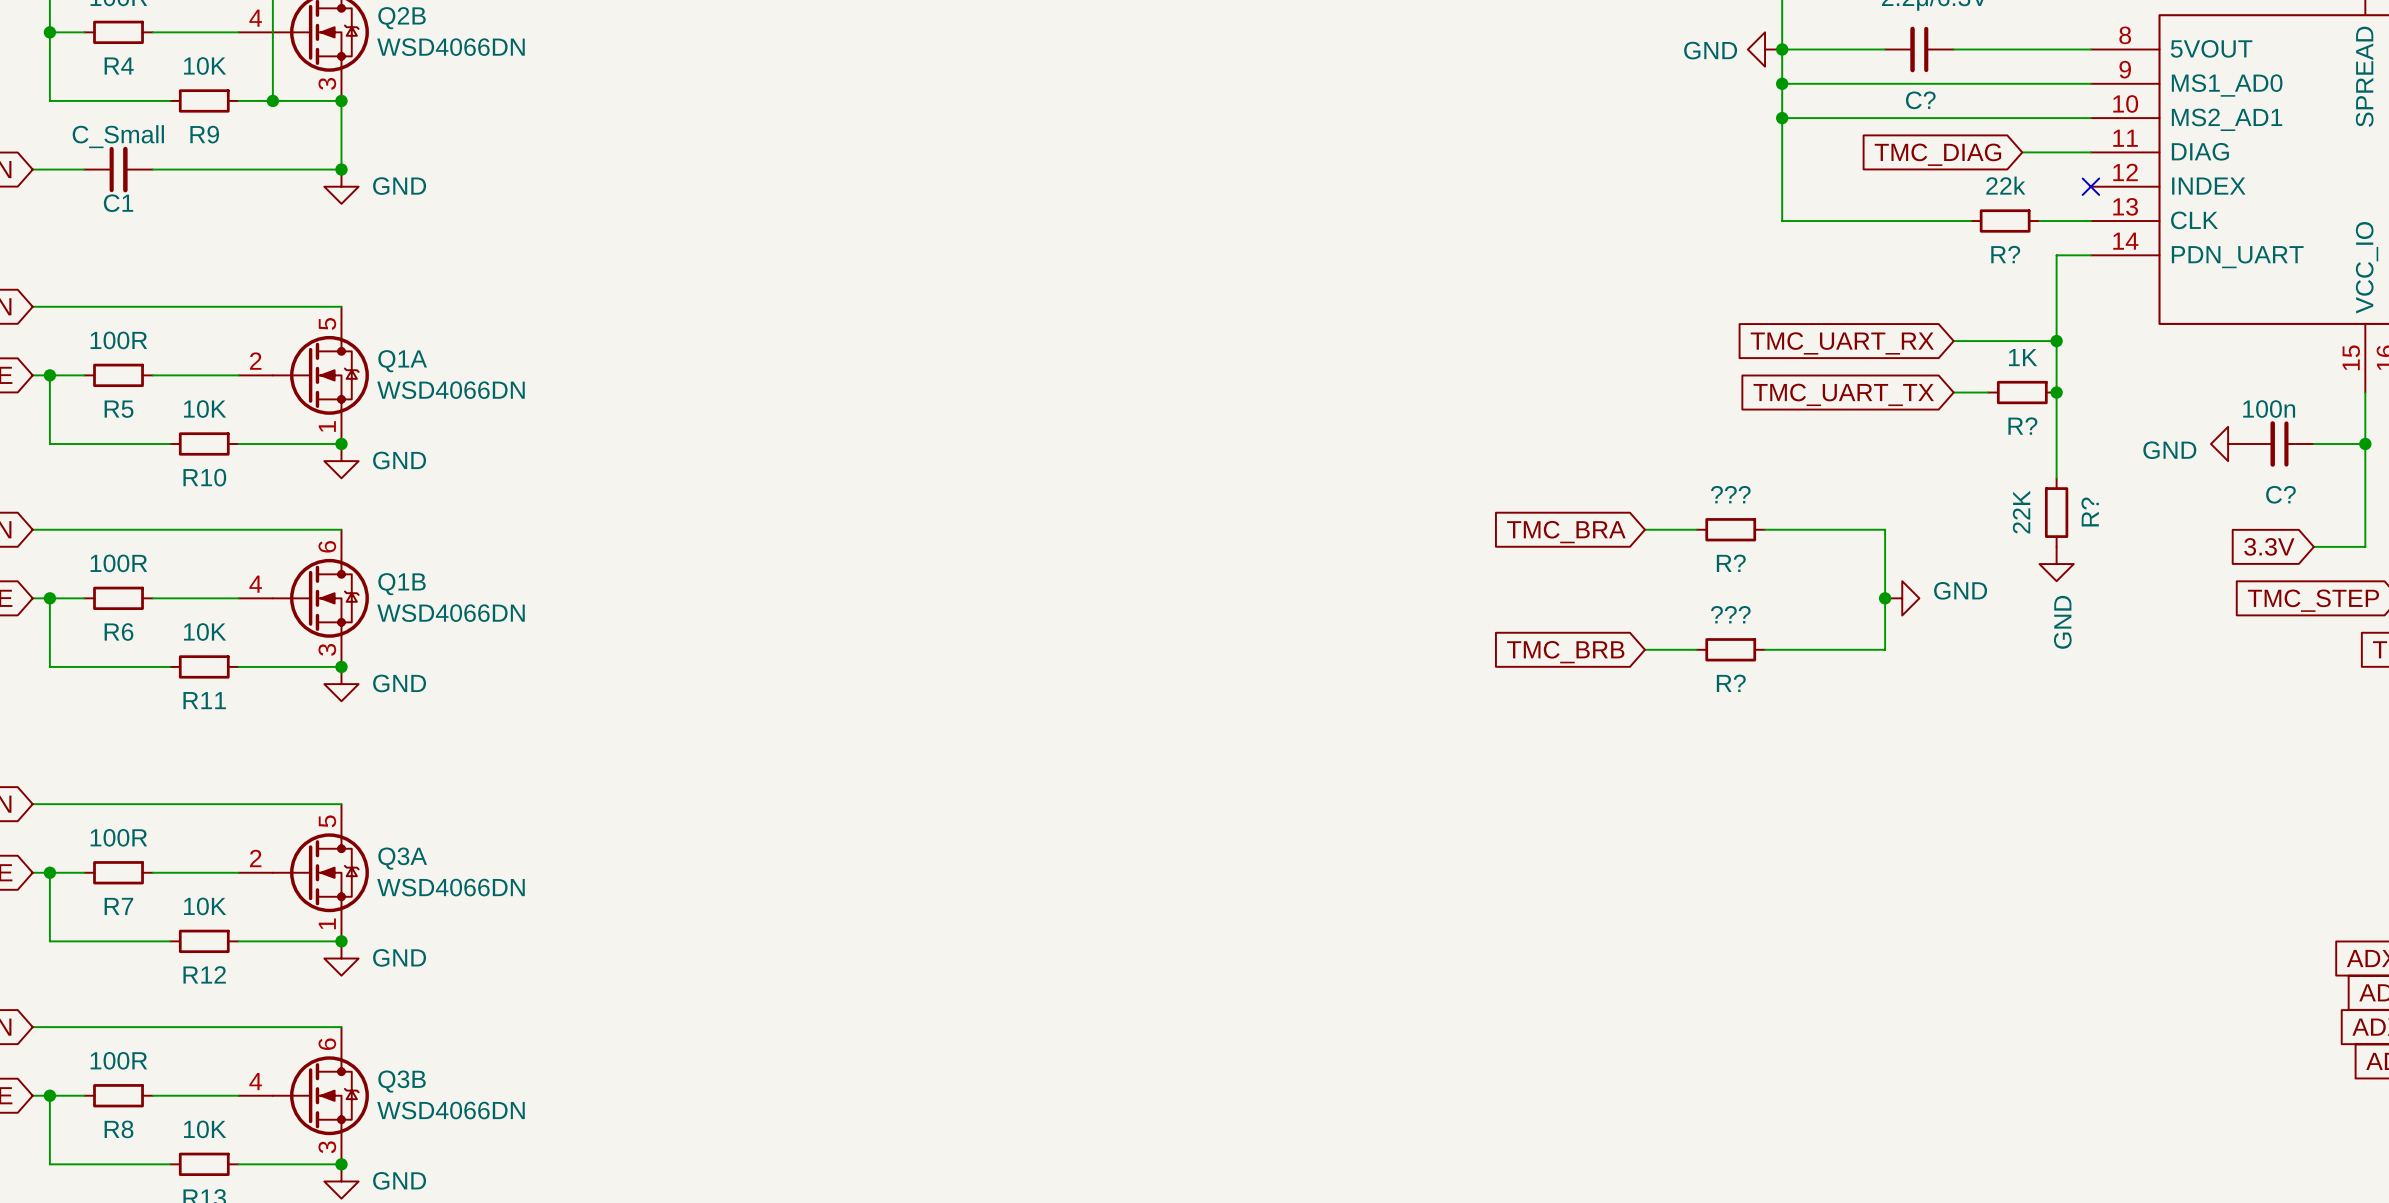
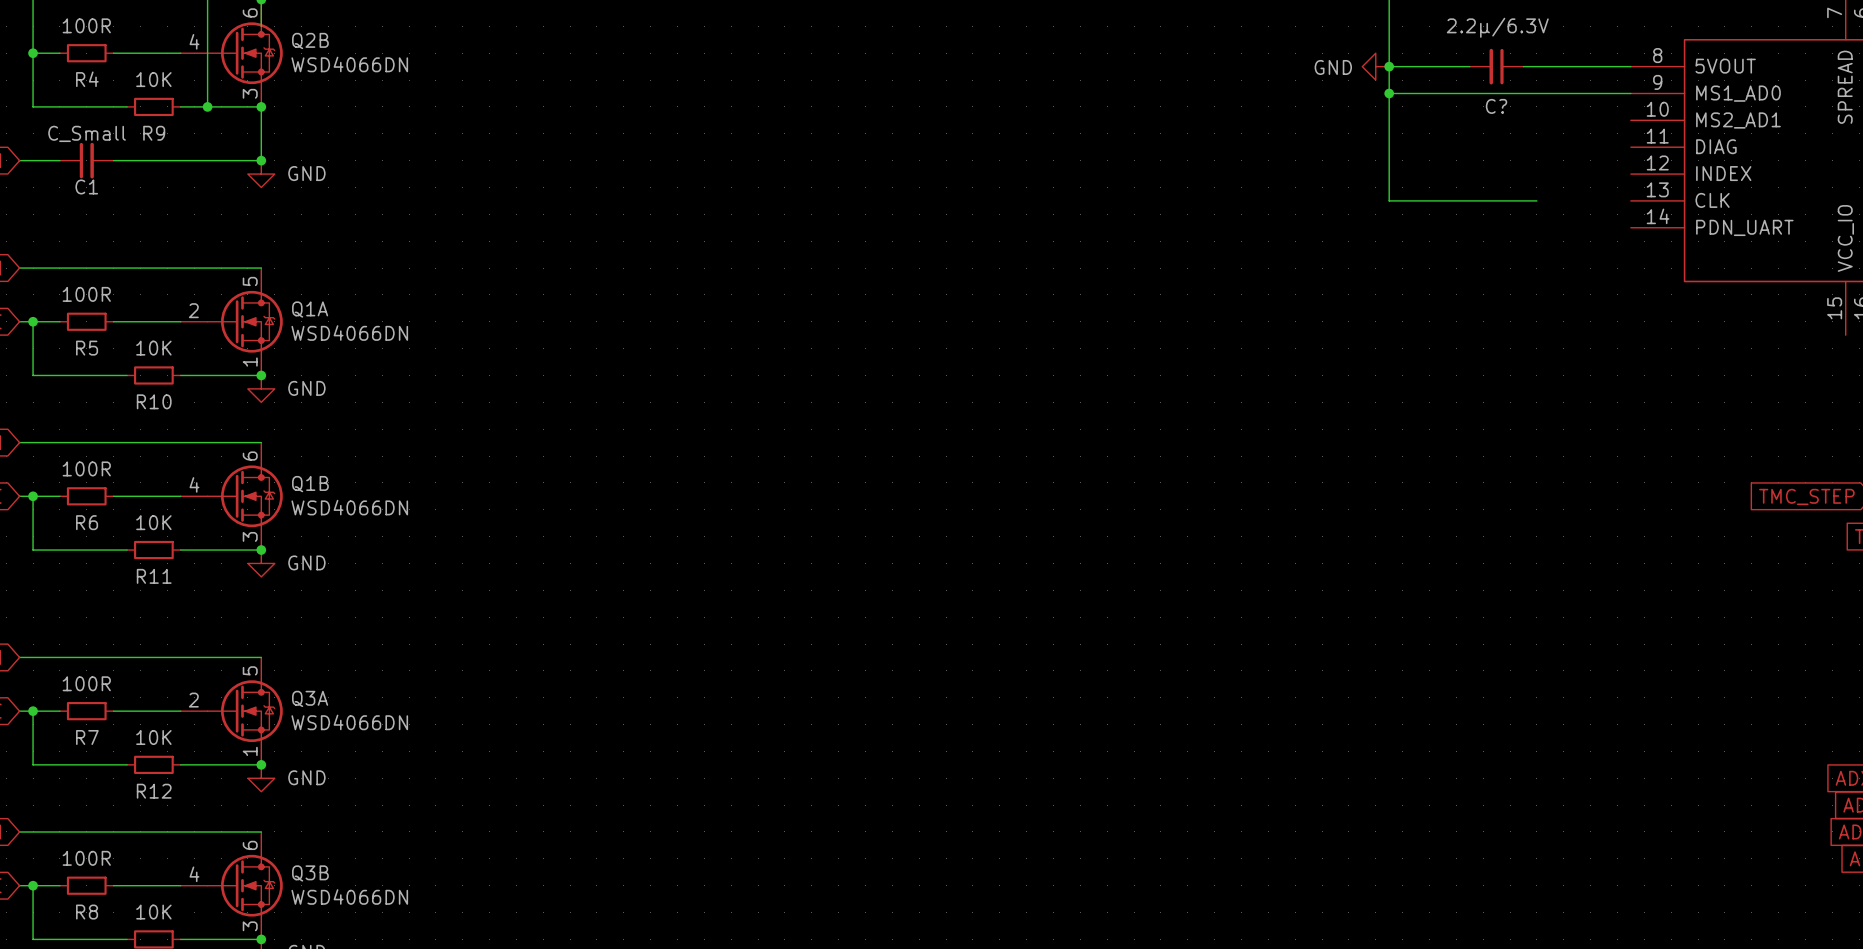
wire: (1782, 118) (2090, 118) -> none
junction: (1782, 118) -> none
wire: (2022, 152) (2090, 152) -> none
global label: TMC_DIAG (1937, 154) -> none
no-connect mark: (2090, 186) -> none
R?: 22k (2005, 221) -> none
wire: (2039, 221) (2090, 221) -> none
wire: (2090, 255) (2056, 255) (2056, 478) -> none
wire: (1953, 341) (2056, 341) -> none
junction: (2056, 341) -> none
global label: TMC_UART_RX (1842, 343) -> none
wire: (1953, 392) (1988, 392) -> none
R?: 1K (2022, 392) -> none
junction: (2056, 392) -> none
wire: (2365, 392) (2365, 546) (2313, 546) -> none
global label: TMC_UART_TX (1843, 394) -> none
power symbol: GND (2228, 443) -> none
C?: 100n (2279, 443) -> none
wire: (2313, 443) (2365, 443) -> none
junction: (2365, 443) -> none
R?: 22K (2056, 512) -> none
wire: (1644, 529) (1696, 529) -> none
R?: ??? (1730, 529) -> none
wire: (1765, 529) (1885, 529) (1885, 649) (1765, 649) -> none
global label: TMC_BRA (1566, 532) -> none
global label: 3.3V (2269, 546) -> none
power symbol: GND (2056, 564) -> none
junction: (1885, 598) -> none
power symbol: GND (1902, 598) -> none
wire: (1644, 649) (1696, 649) -> none
R?: ??? (1730, 649) -> none
global label: TMC_BRB (1565, 652) -> none

